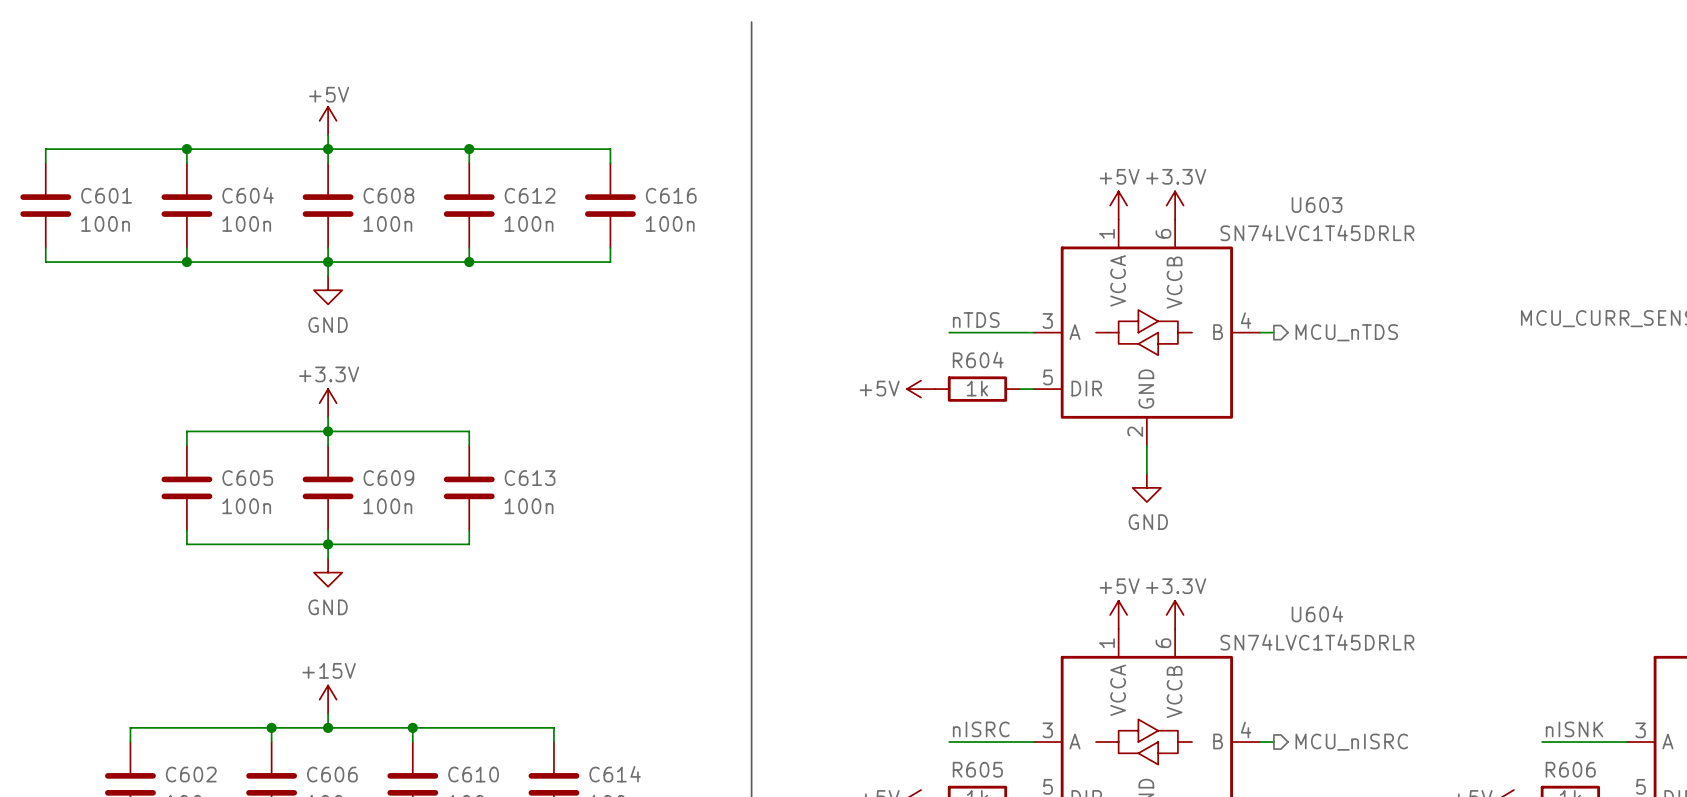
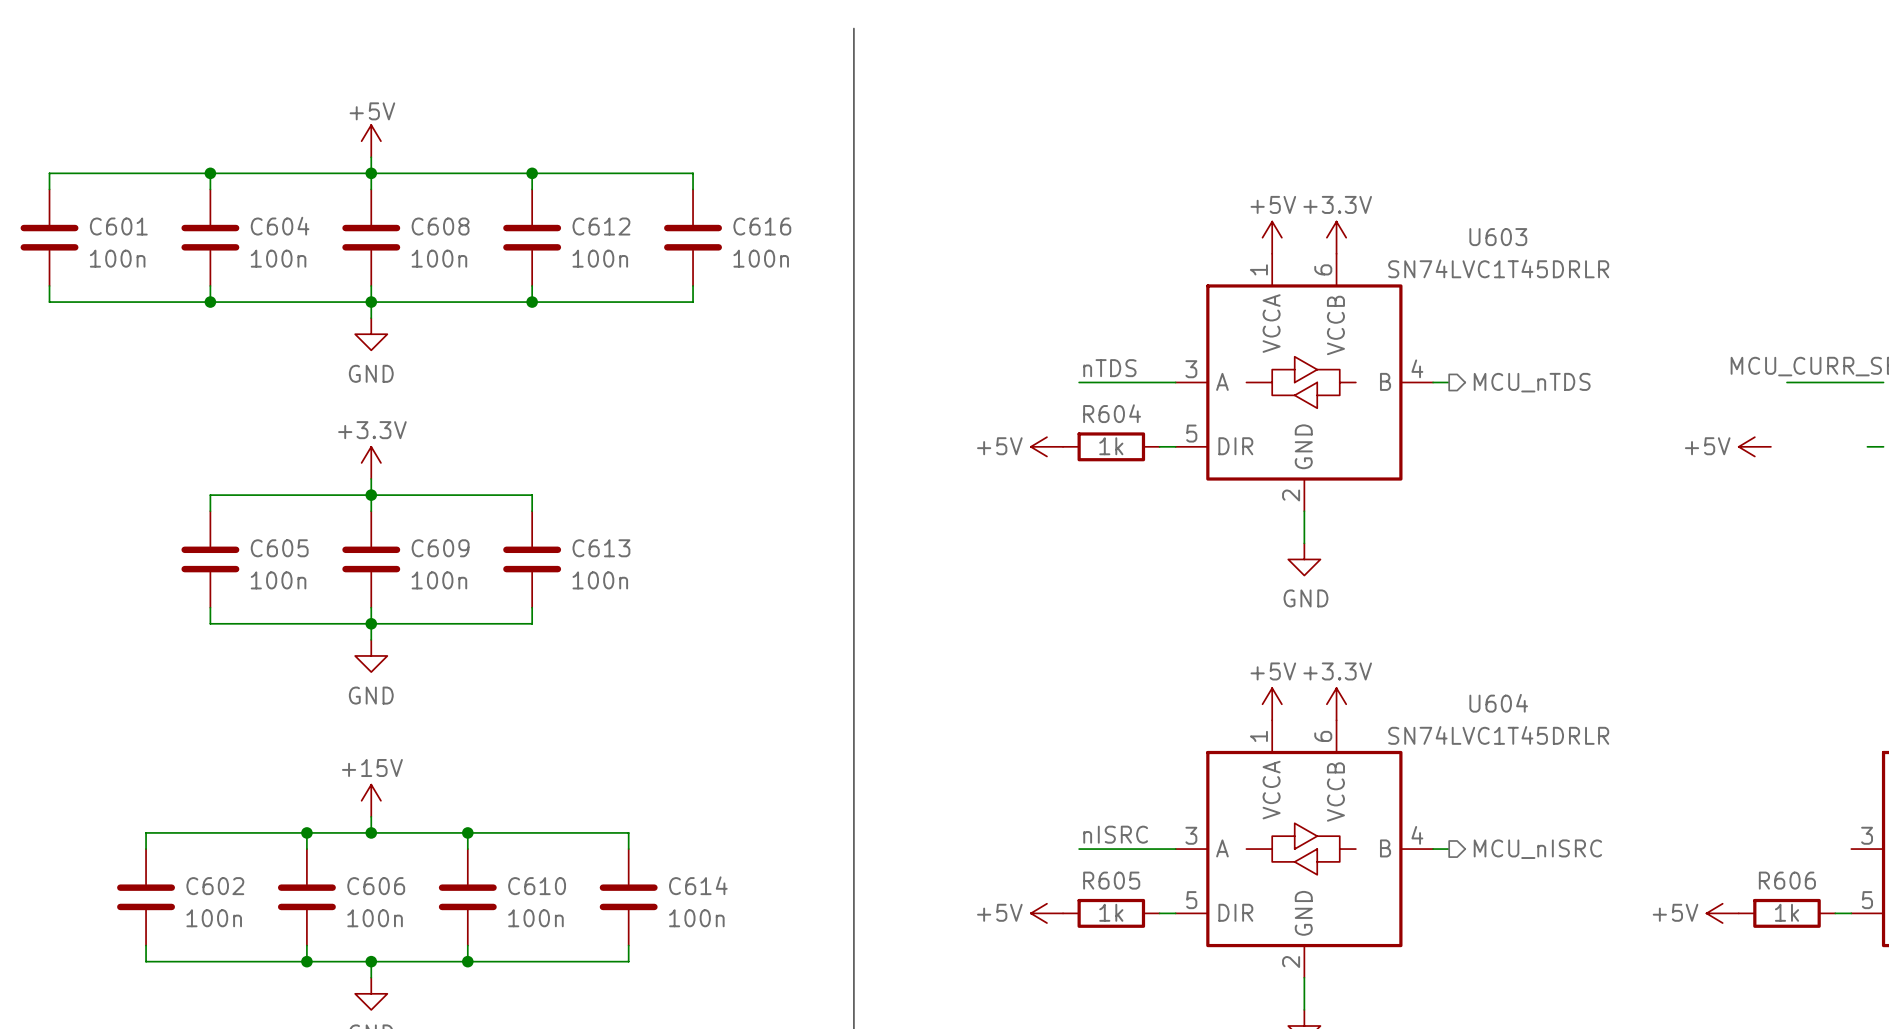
wire: none -> (1787, 382) (1883, 382)
power symbol: none -> +5V (1754, 446)
wire: none -> (1867, 446) (1883, 446)
label: nISNK (1574, 729) -> none
wire: (1542, 742) (1626, 742) -> none

